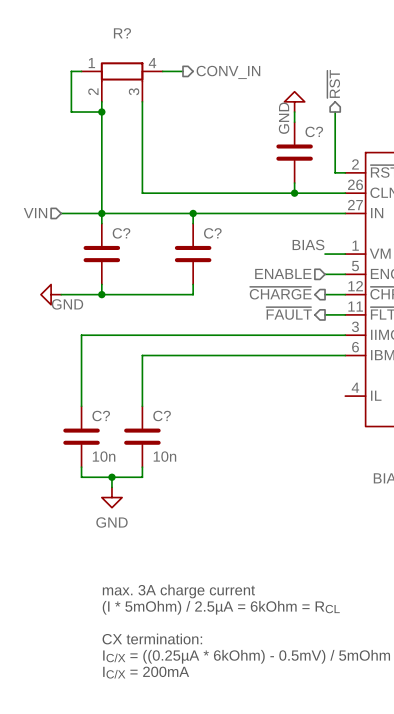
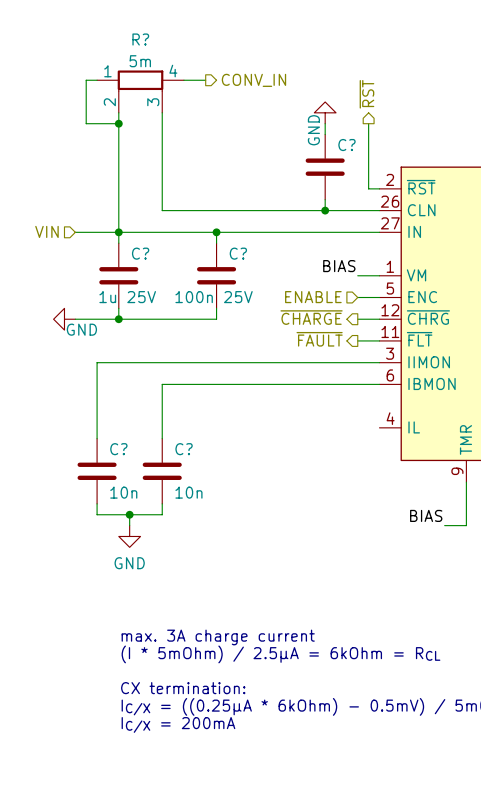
R? value: none -> 5m (140, 61)
C? value: none -> 1u 25V (127, 297)
C? value: none -> 100n 25V (214, 297)

